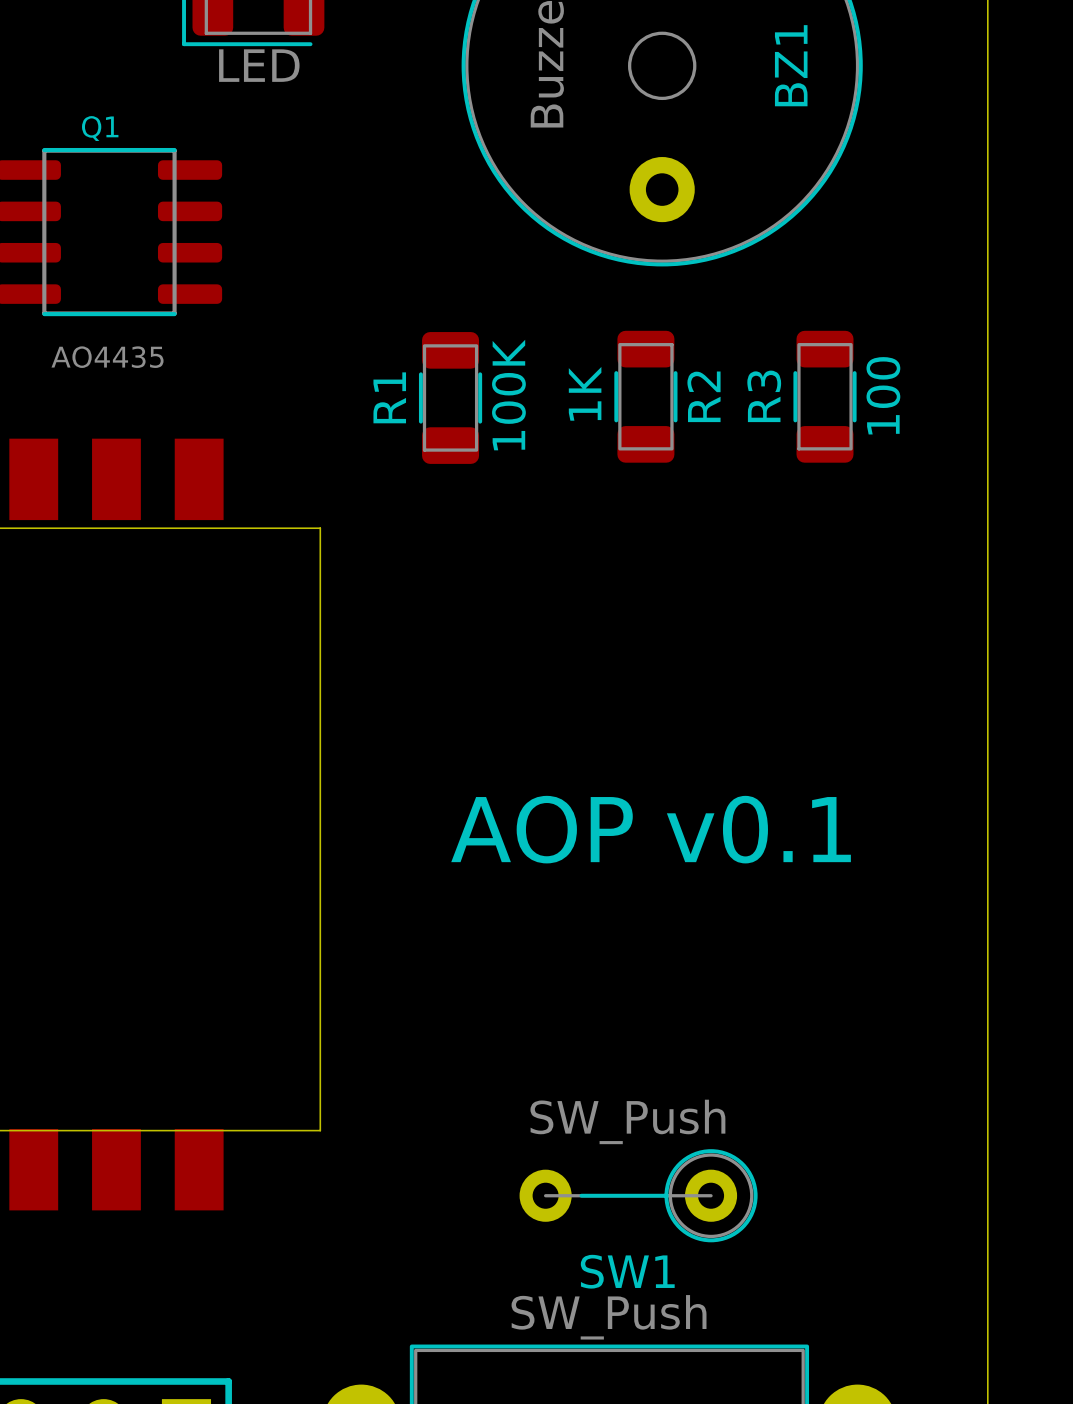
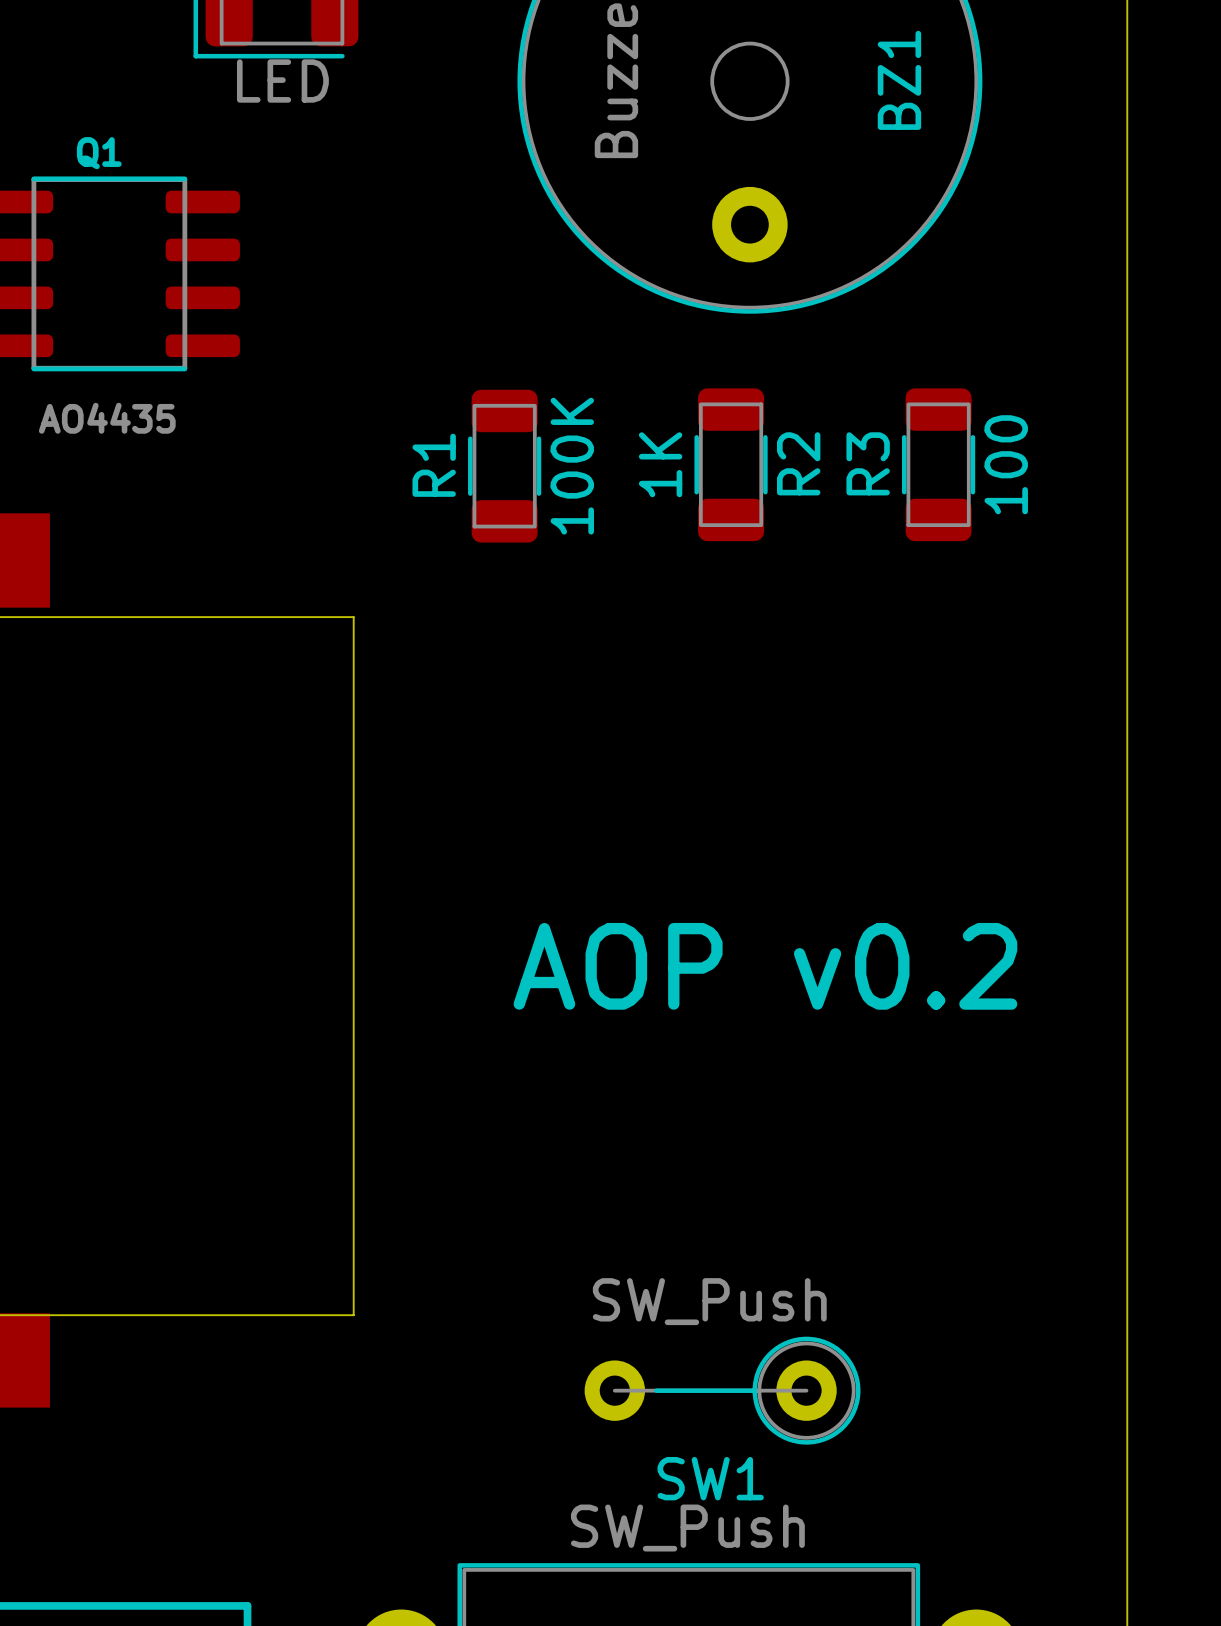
part: (116, 479) -> none
part: (199, 479) -> none
text: AOP v0.1 (651, 829) -> AOP v0.2 (765, 966)
part: (116, 1169) -> none
part: (199, 1169) -> none

